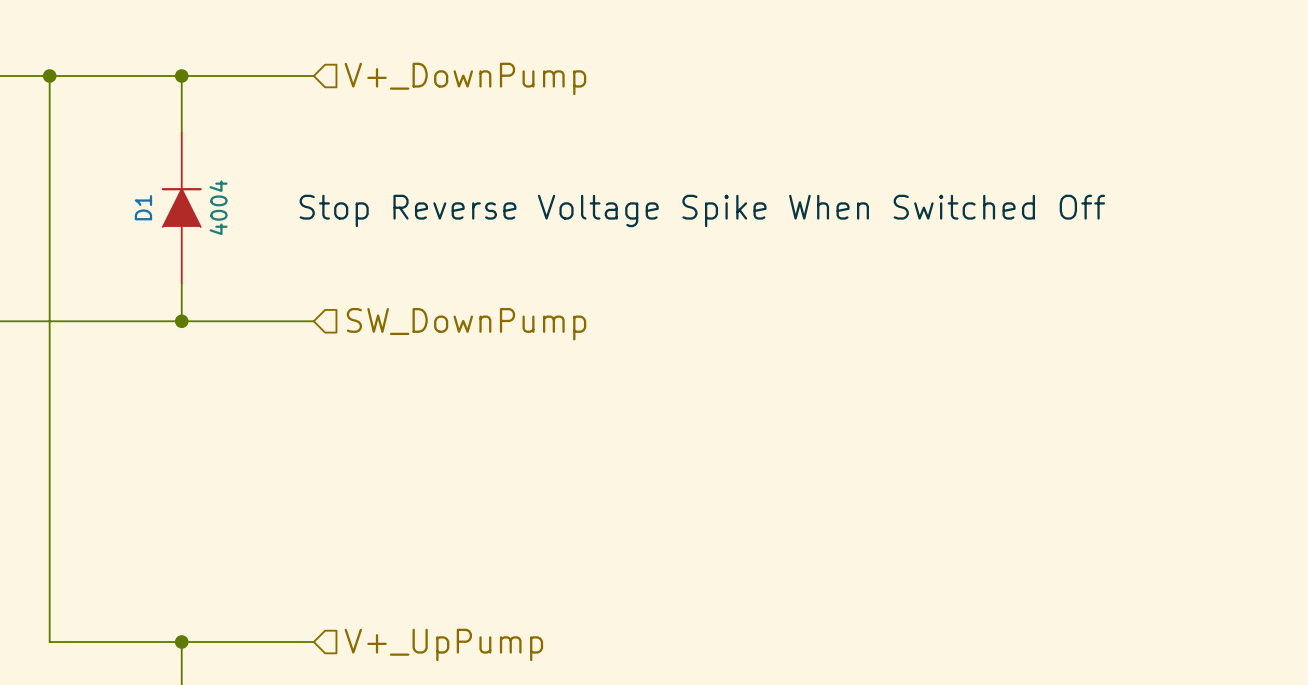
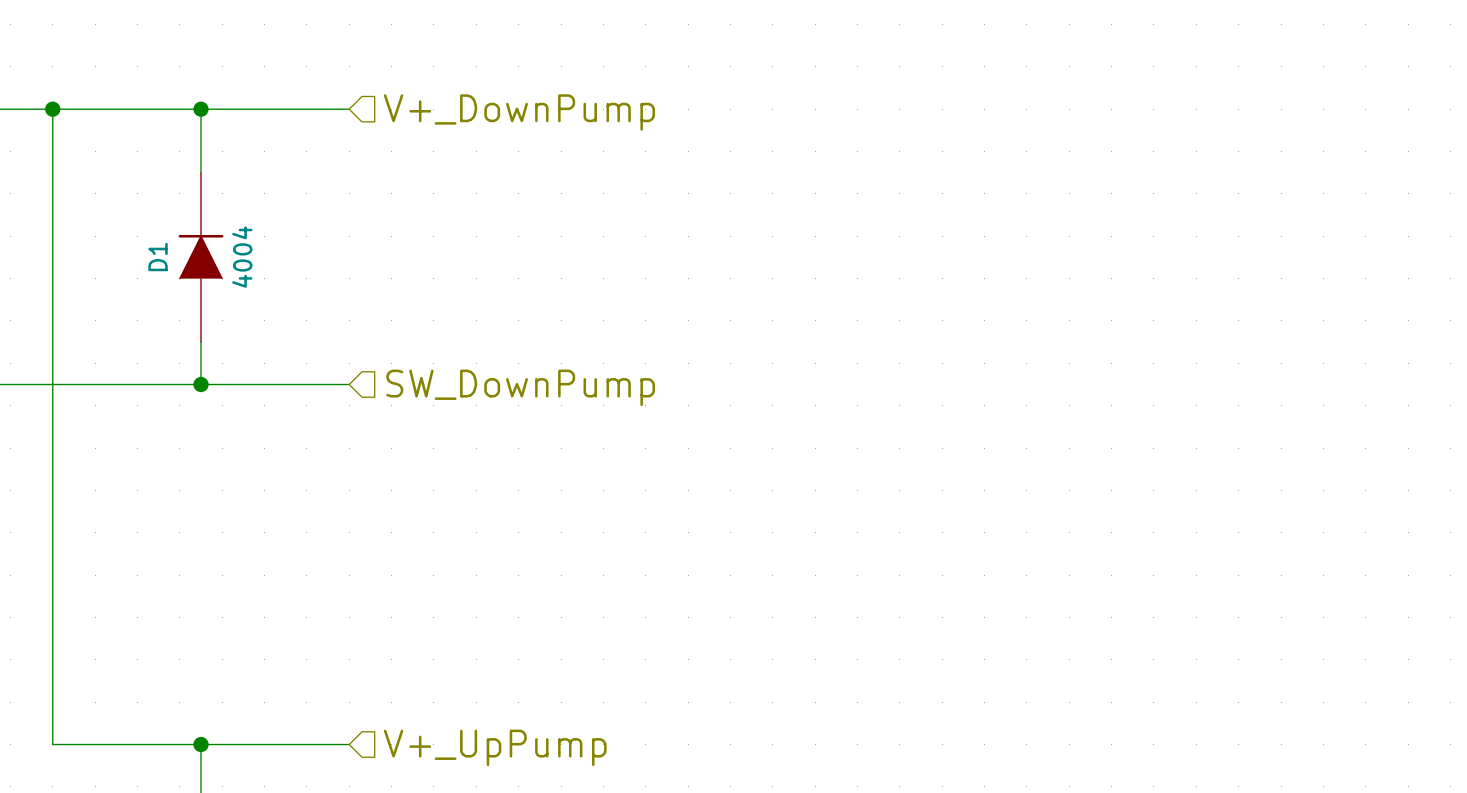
label: Stop Reverse Voltage Spike When Switched Off (702, 210) -> none

